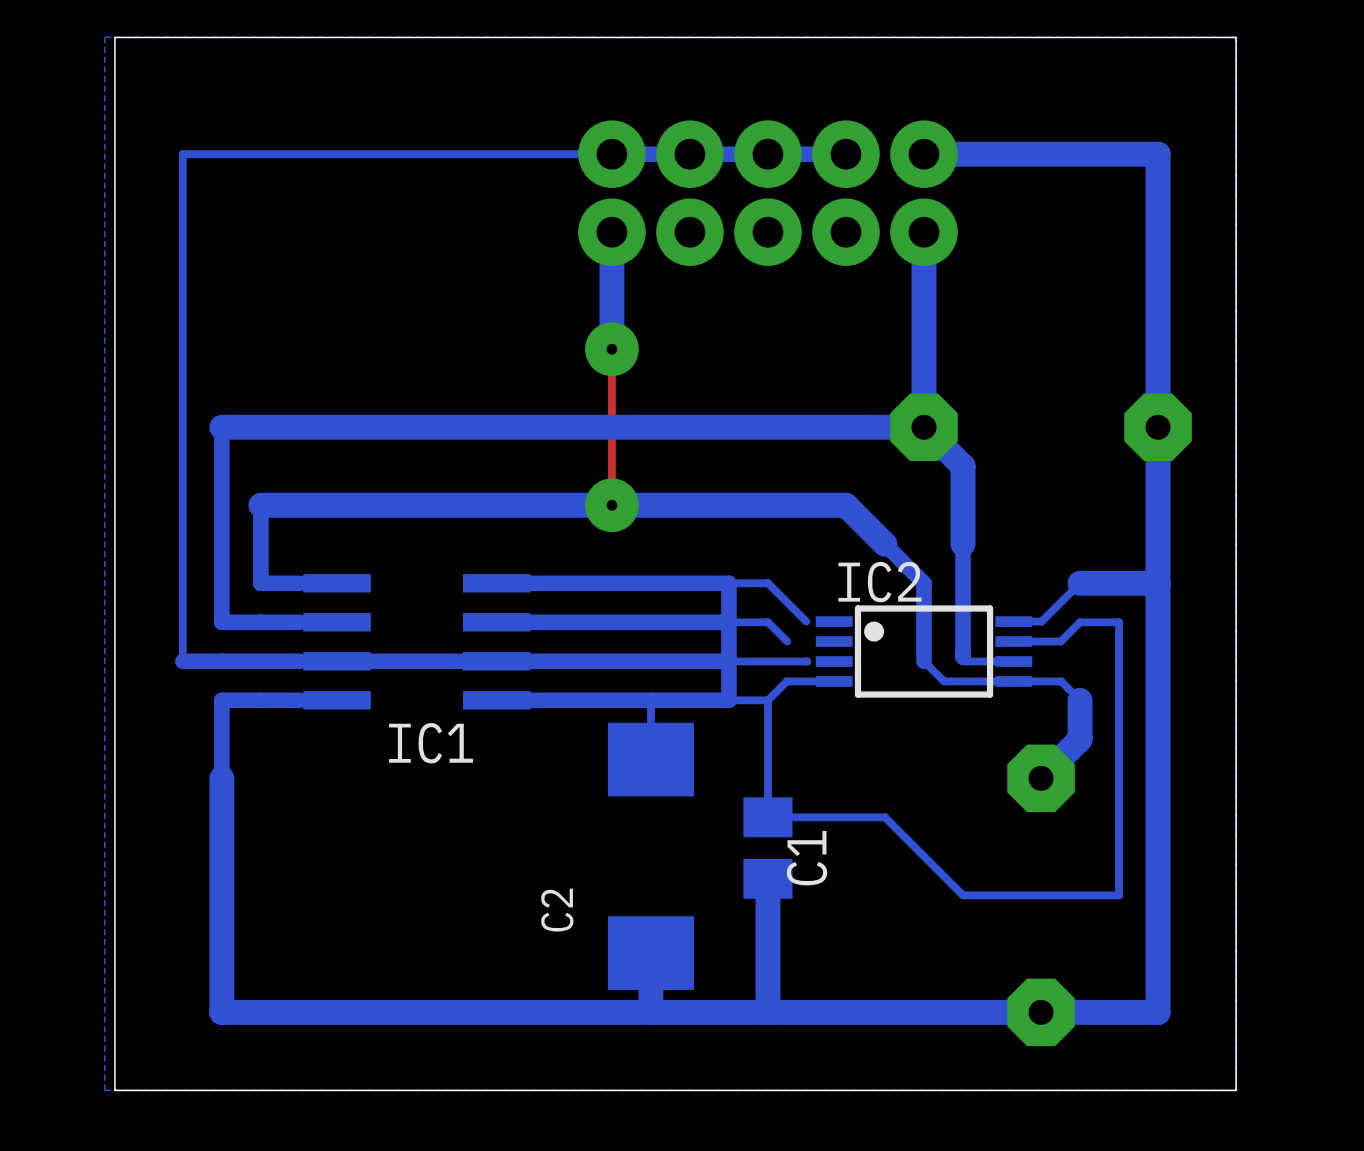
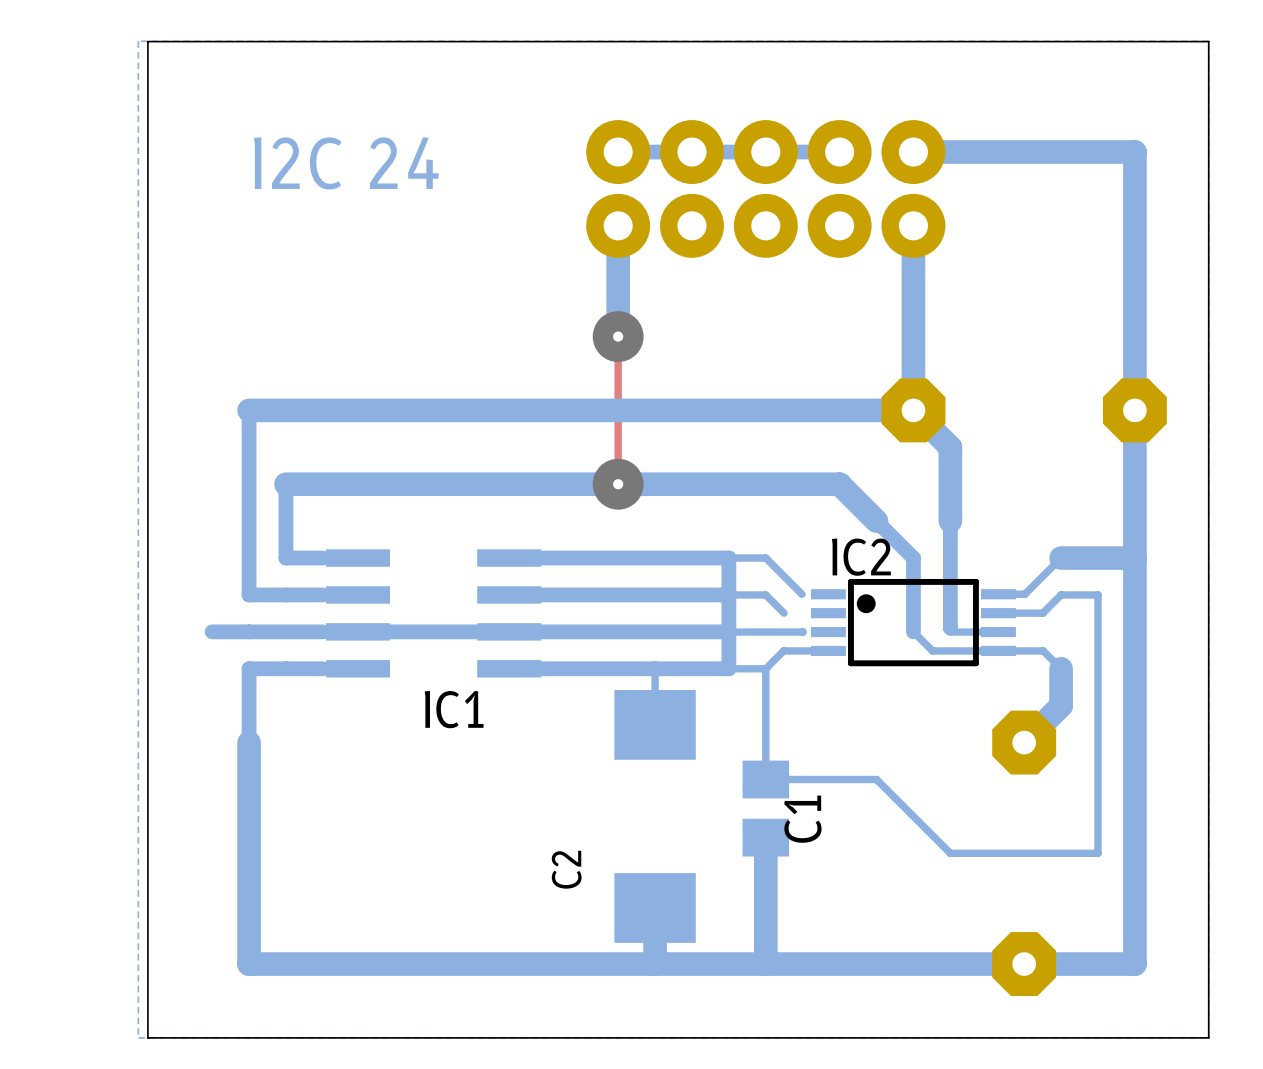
bottom track: (611, 154) (182, 154) (182, 661) -> none
text: none -> I2C 24 (346, 163)

